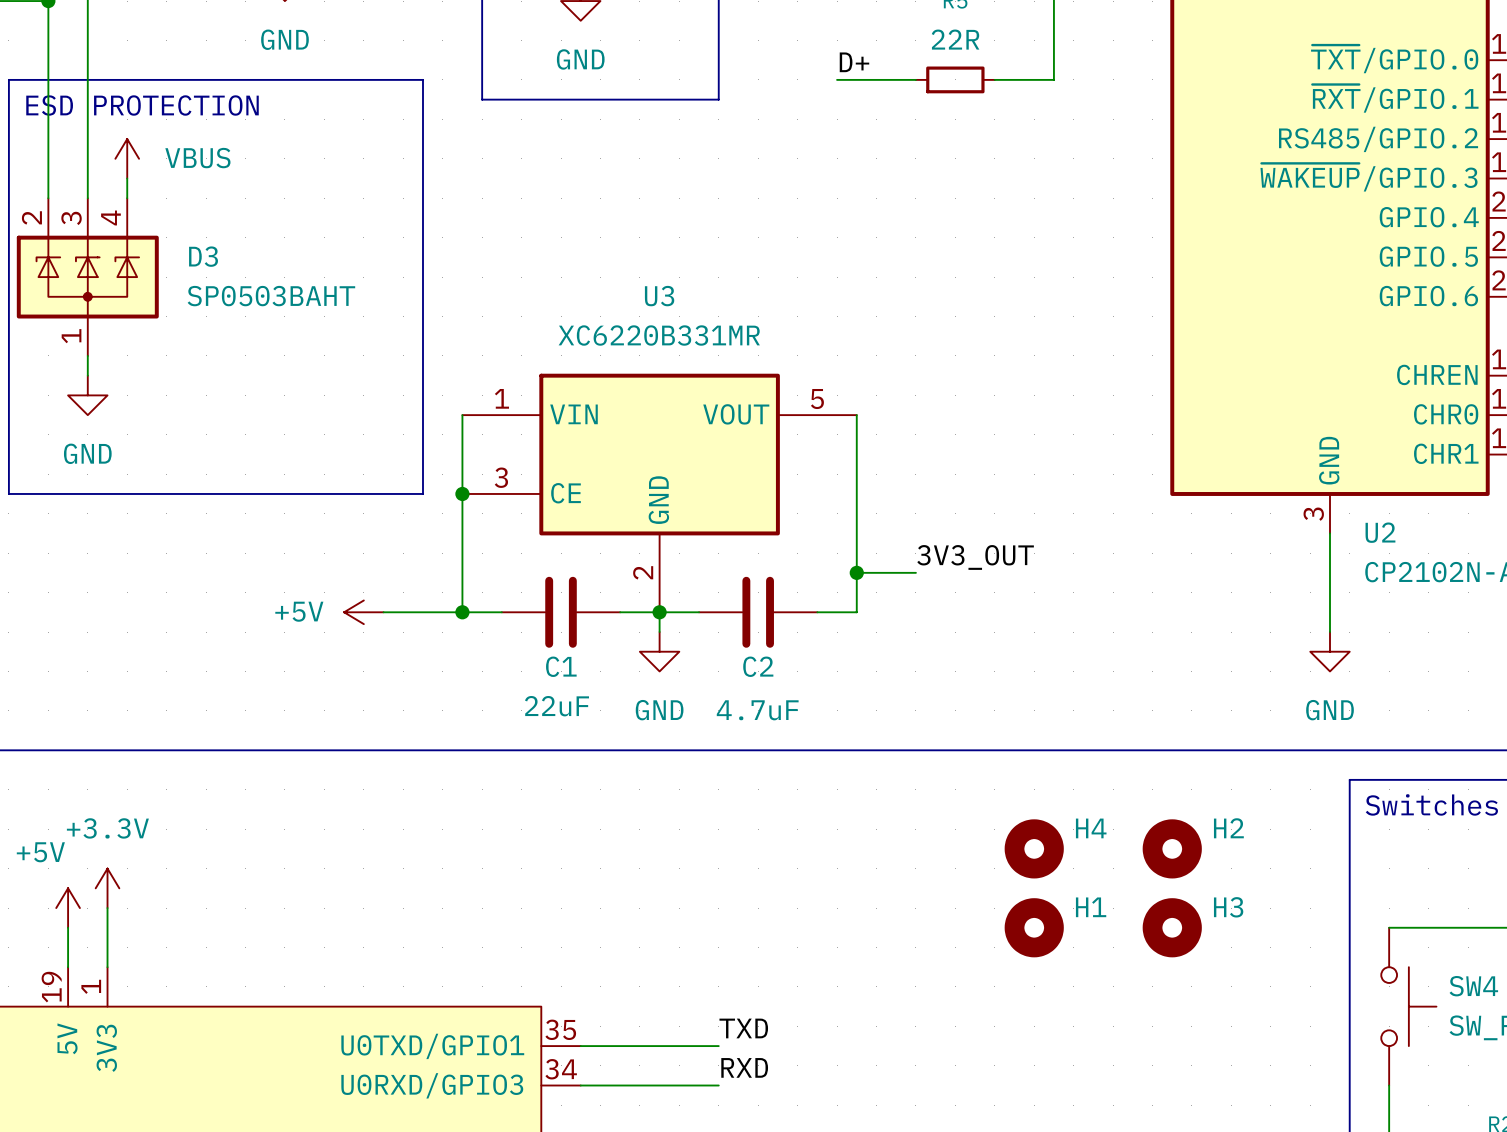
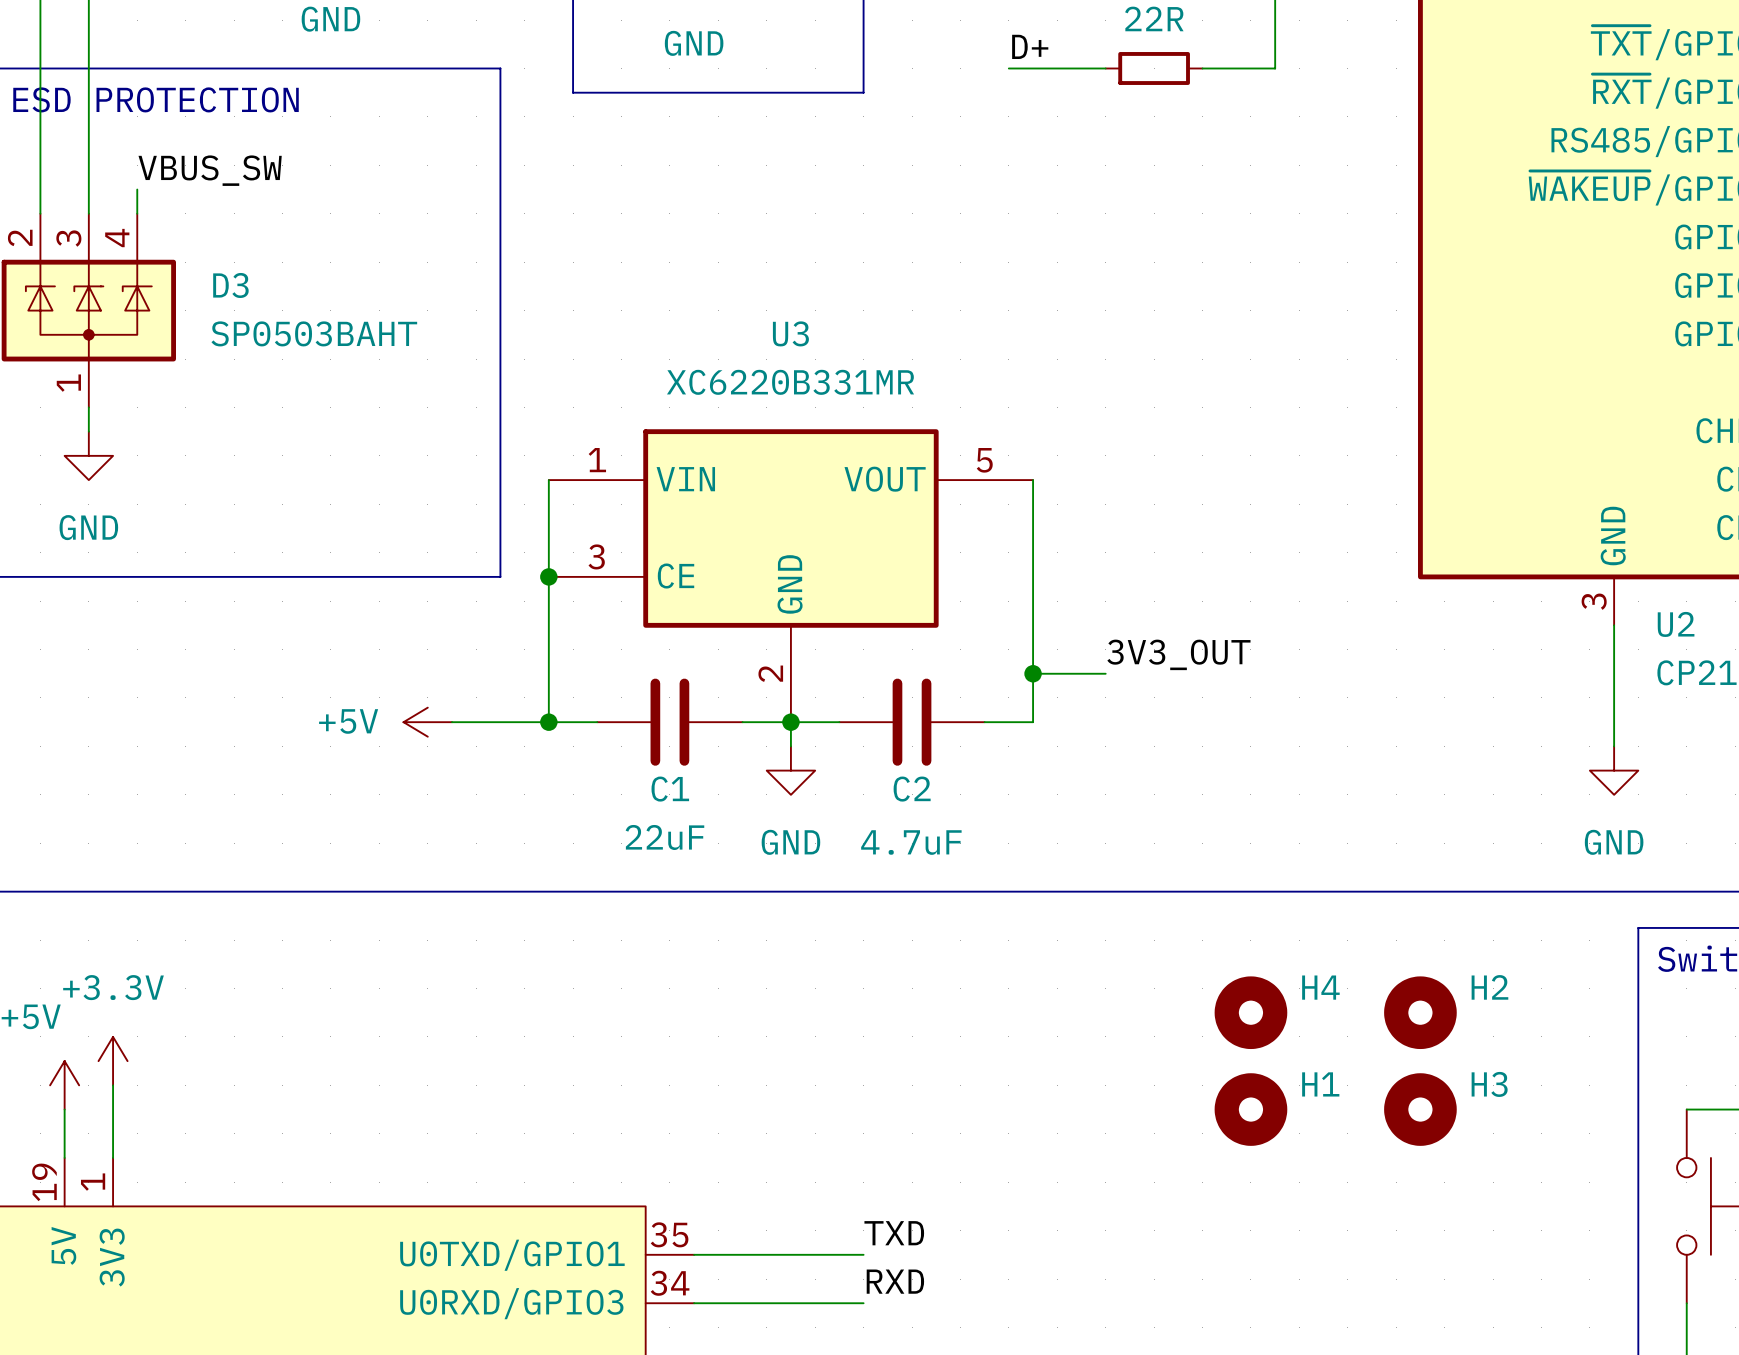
power symbol: VBUS (127, 158) -> none
label: none -> VBUS_SW (210, 170)

